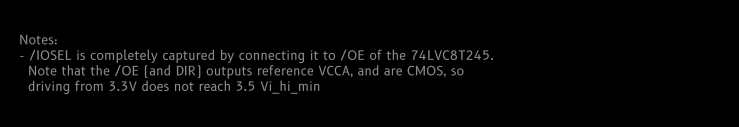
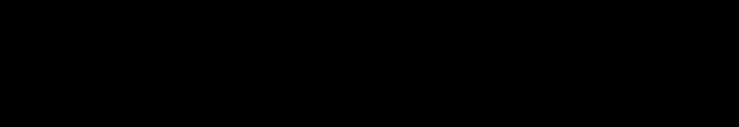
text: Notes: (38, 39) -> none
text: - /IOSEL is completely captured by connecting it to /OE of the 74LVC8T245. (256, 56) -> none
text: Note that the /OE (and DIR) outputs reference VCCA, and are CMOS, so (246, 71) -> none
text: driving from 3.3V does not reach 3.5 Vi_hi_min (173, 87) -> none

